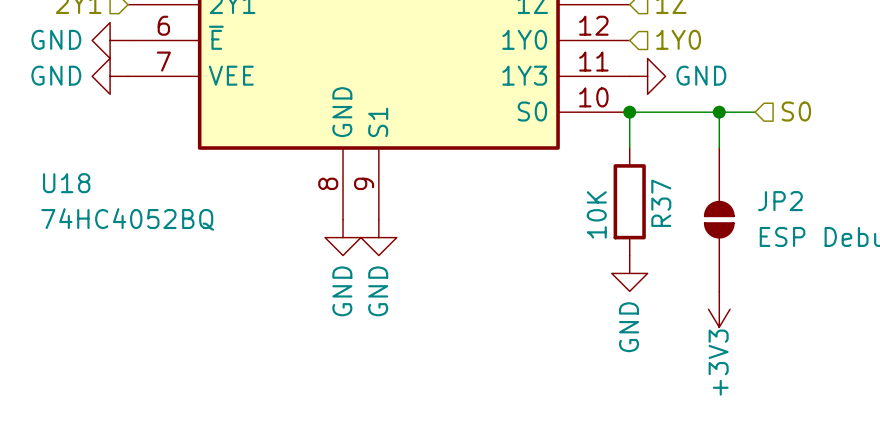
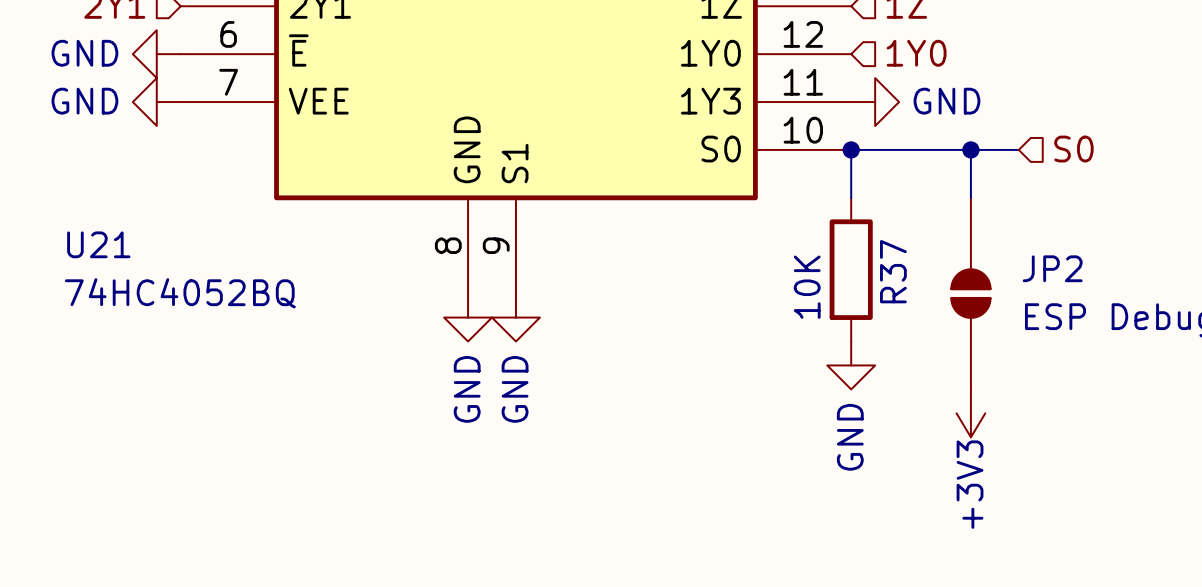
U18 name: U18 (66, 183) -> U21 (98, 244)

